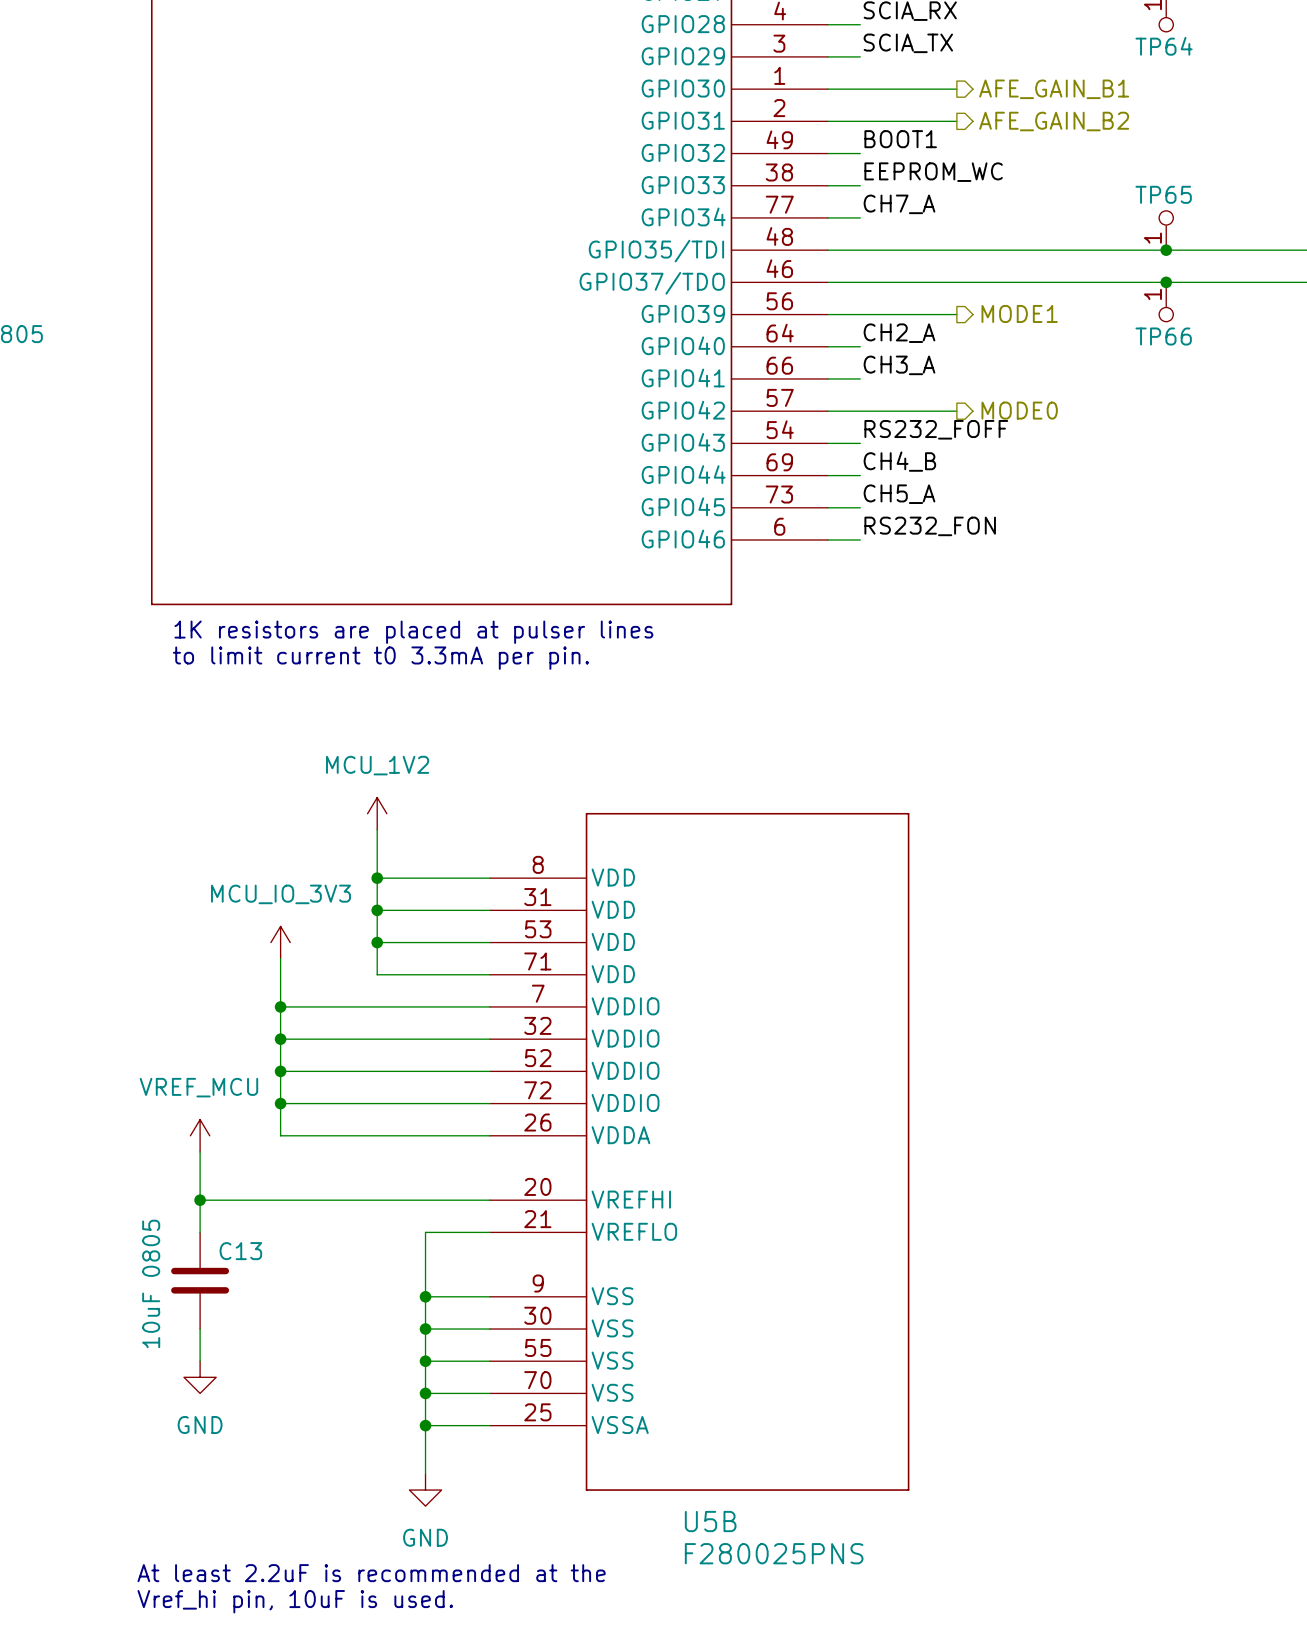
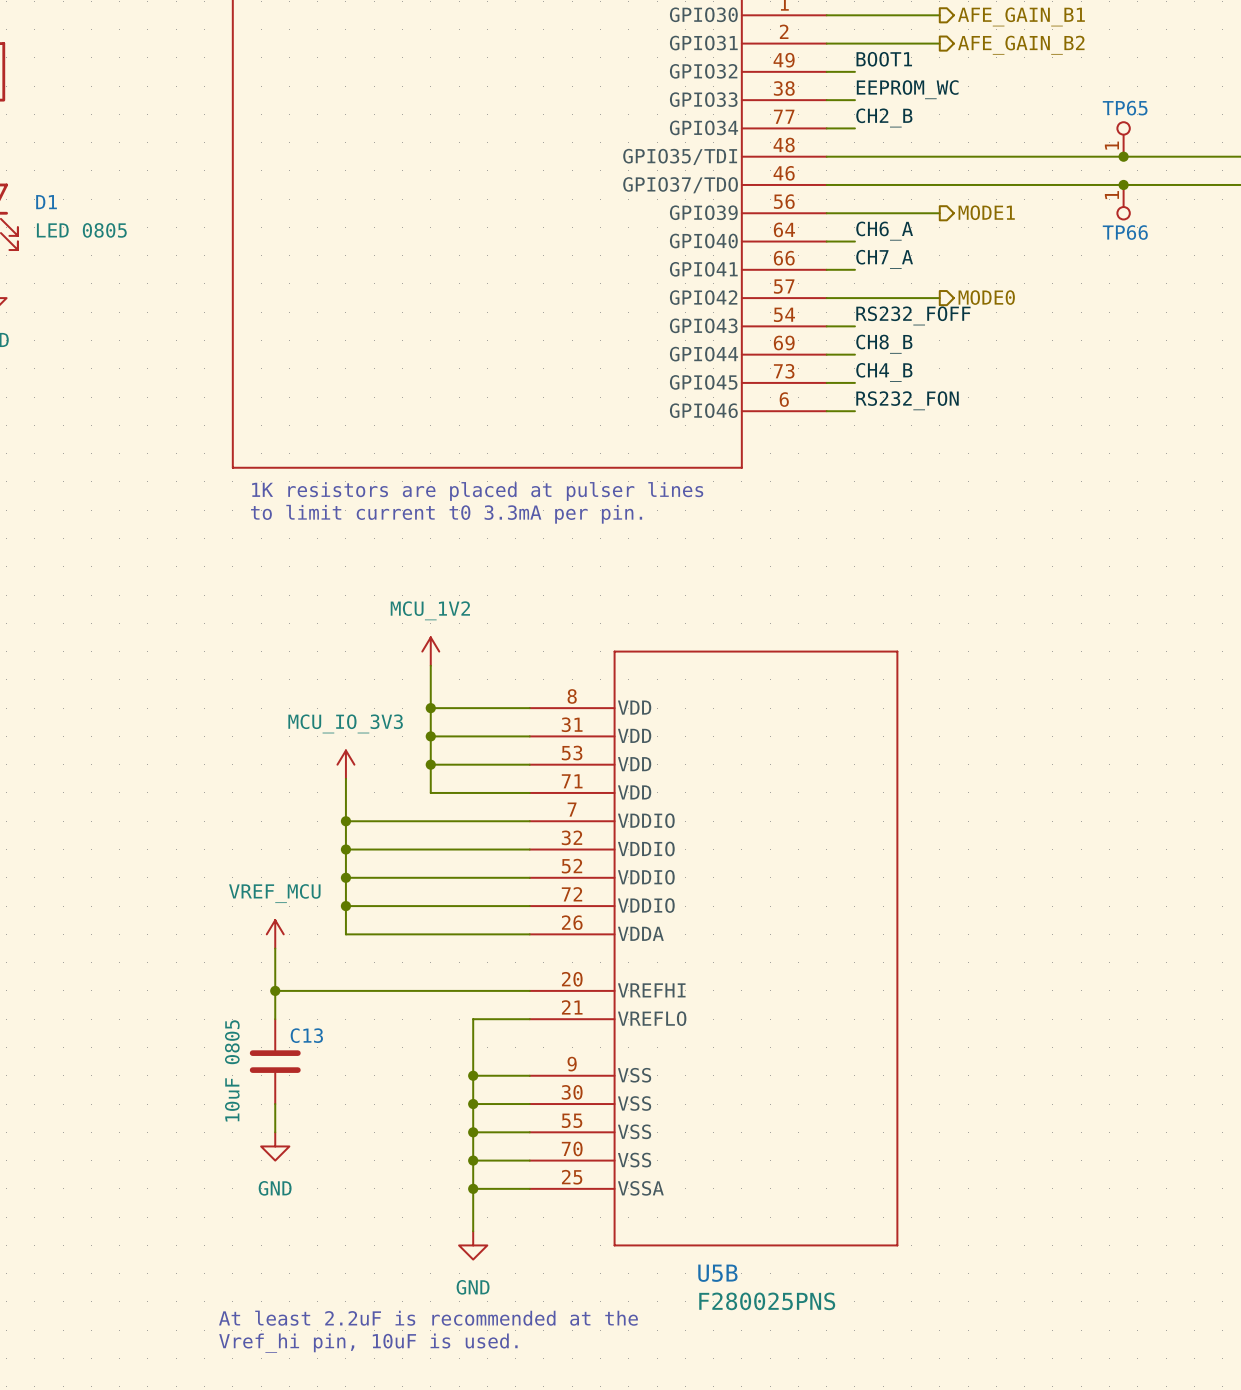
label: CH7_A (899, 204) -> CH2_B (884, 117)
label: CH2_A (899, 333) -> CH6_A (884, 231)
label: CH3_A (899, 365) -> CH7_A (884, 259)
label: CH4_B (899, 461) -> CH8_B (884, 344)
label: CH5_A (899, 494) -> CH4_B (884, 372)

